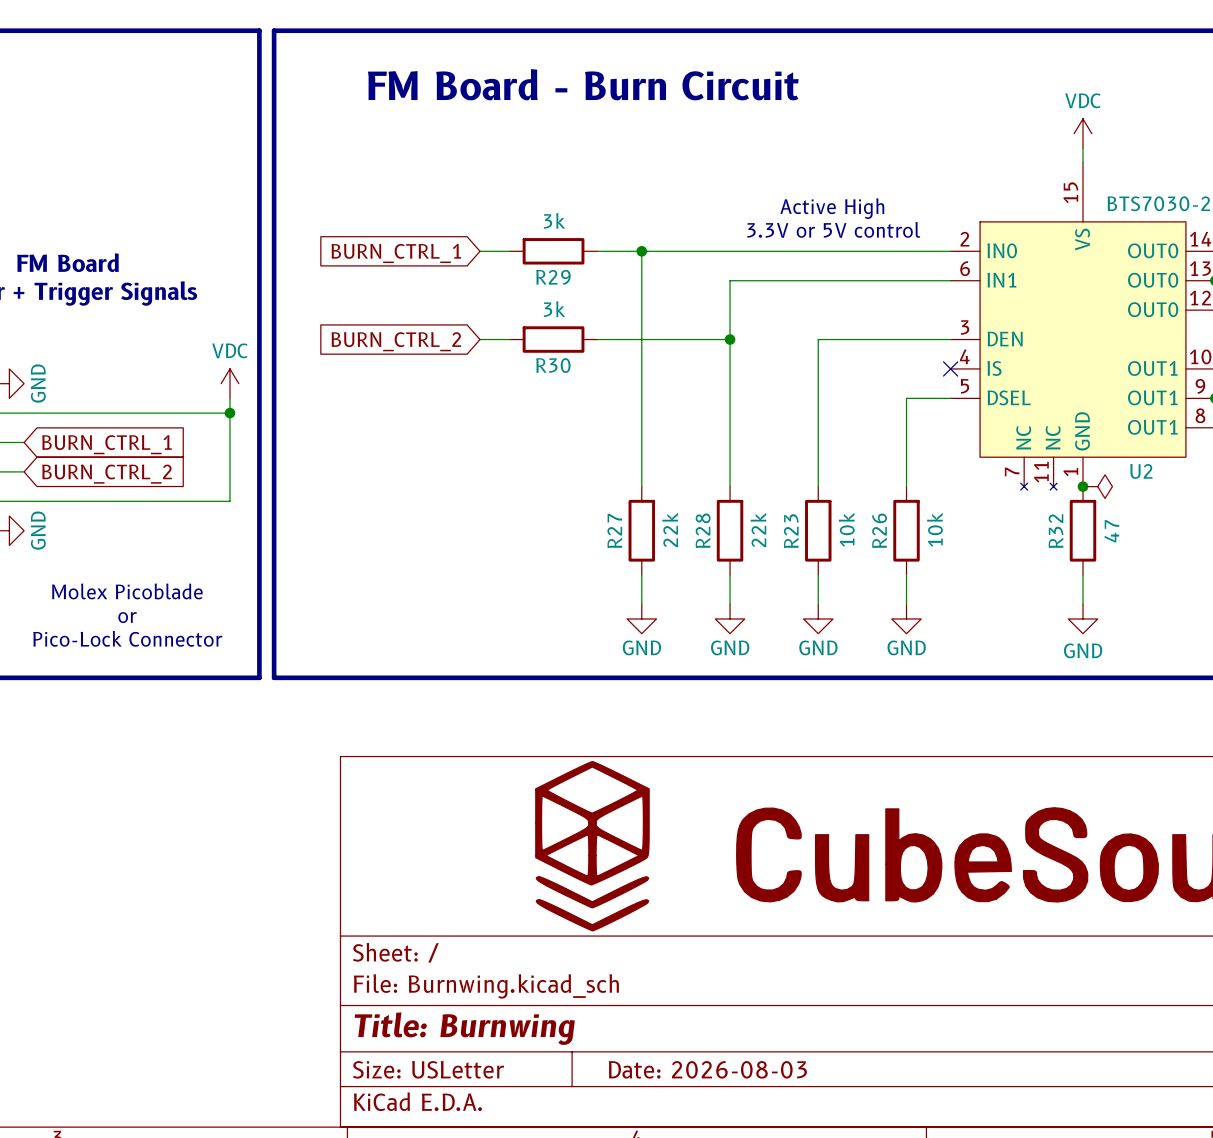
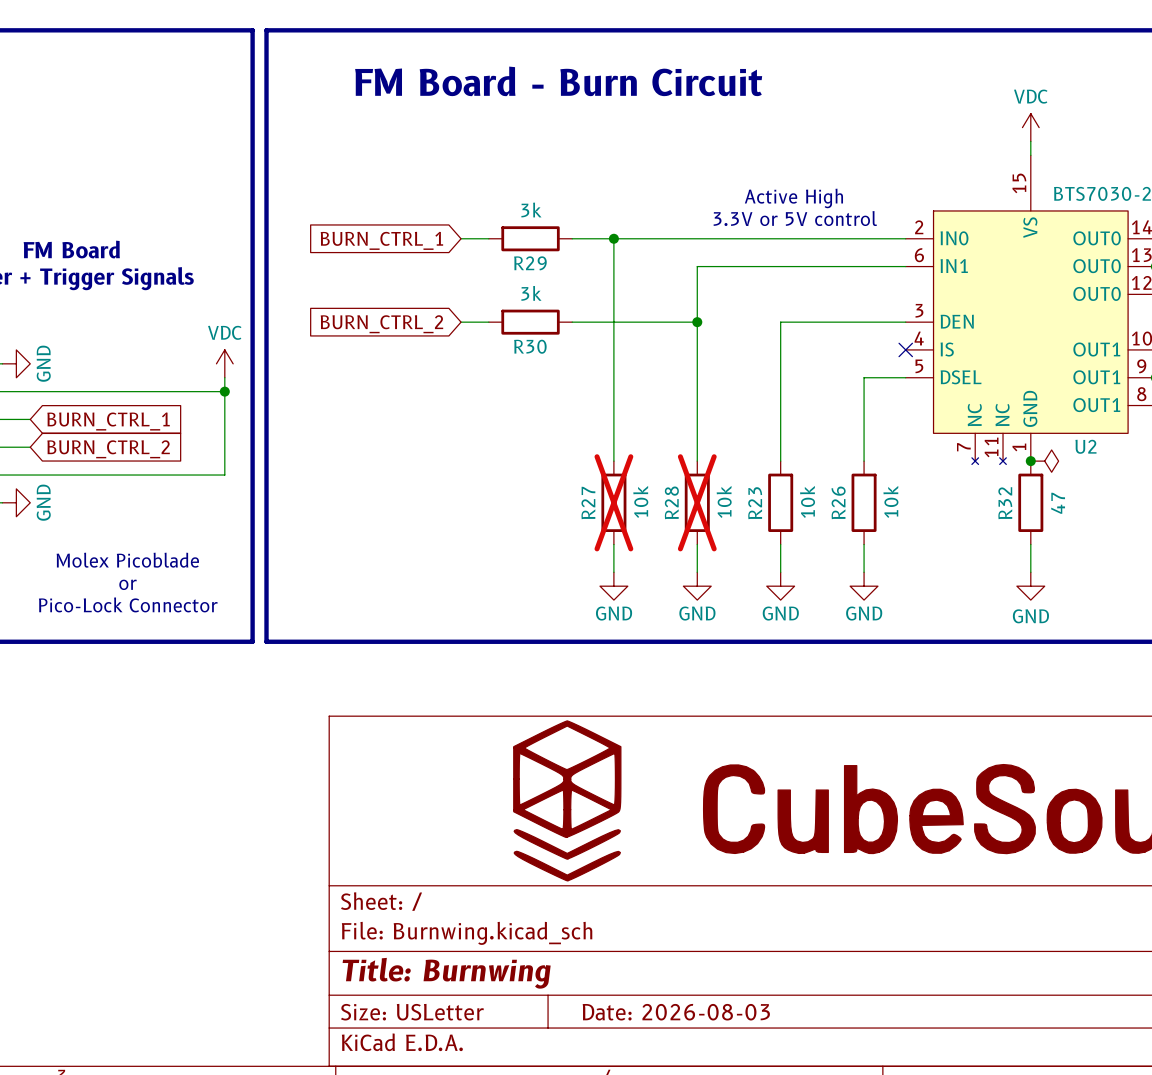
R27 do-not-place cross: none -> (613, 502)
R27 value: 22k (670, 530) -> 10k (640, 501)
R28 do-not-place cross: none -> (697, 502)
R28 value: 22k (758, 530) -> 10k (724, 501)

